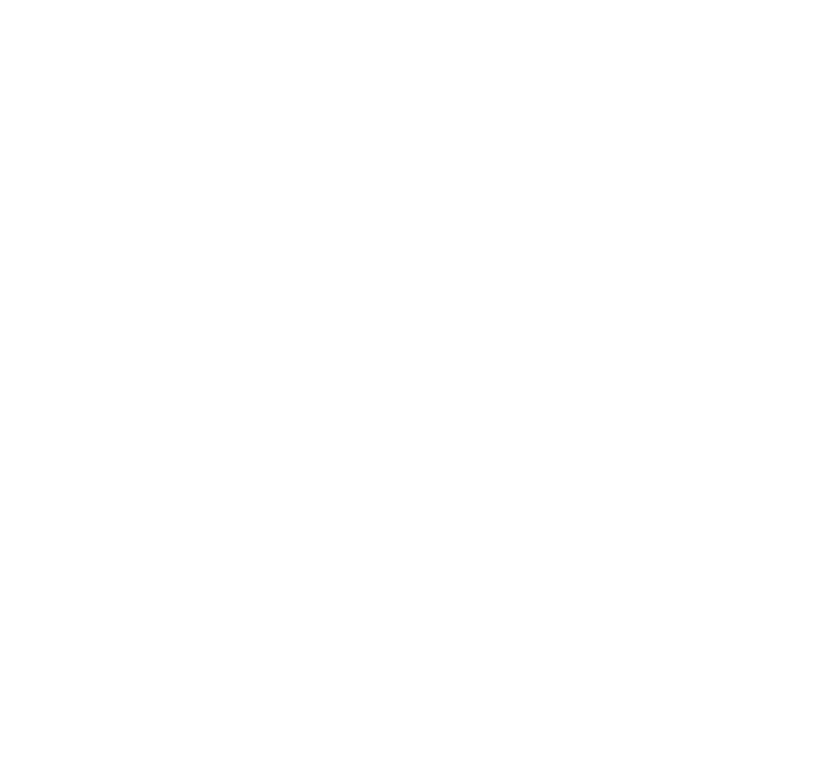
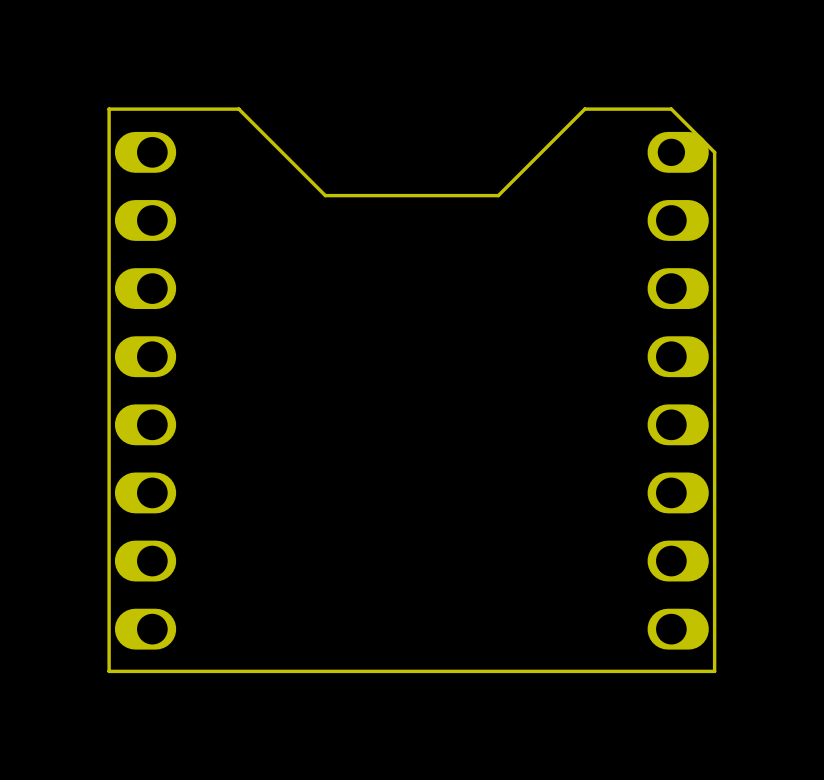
board edge: none -> (109, 109) (109, 671) (714, 671) (714, 152) (671, 109) (584, 109) (498, 195) (325, 195) (238, 109) (109, 109)
part: none -> (145, 390)
part: none -> (678, 390)

